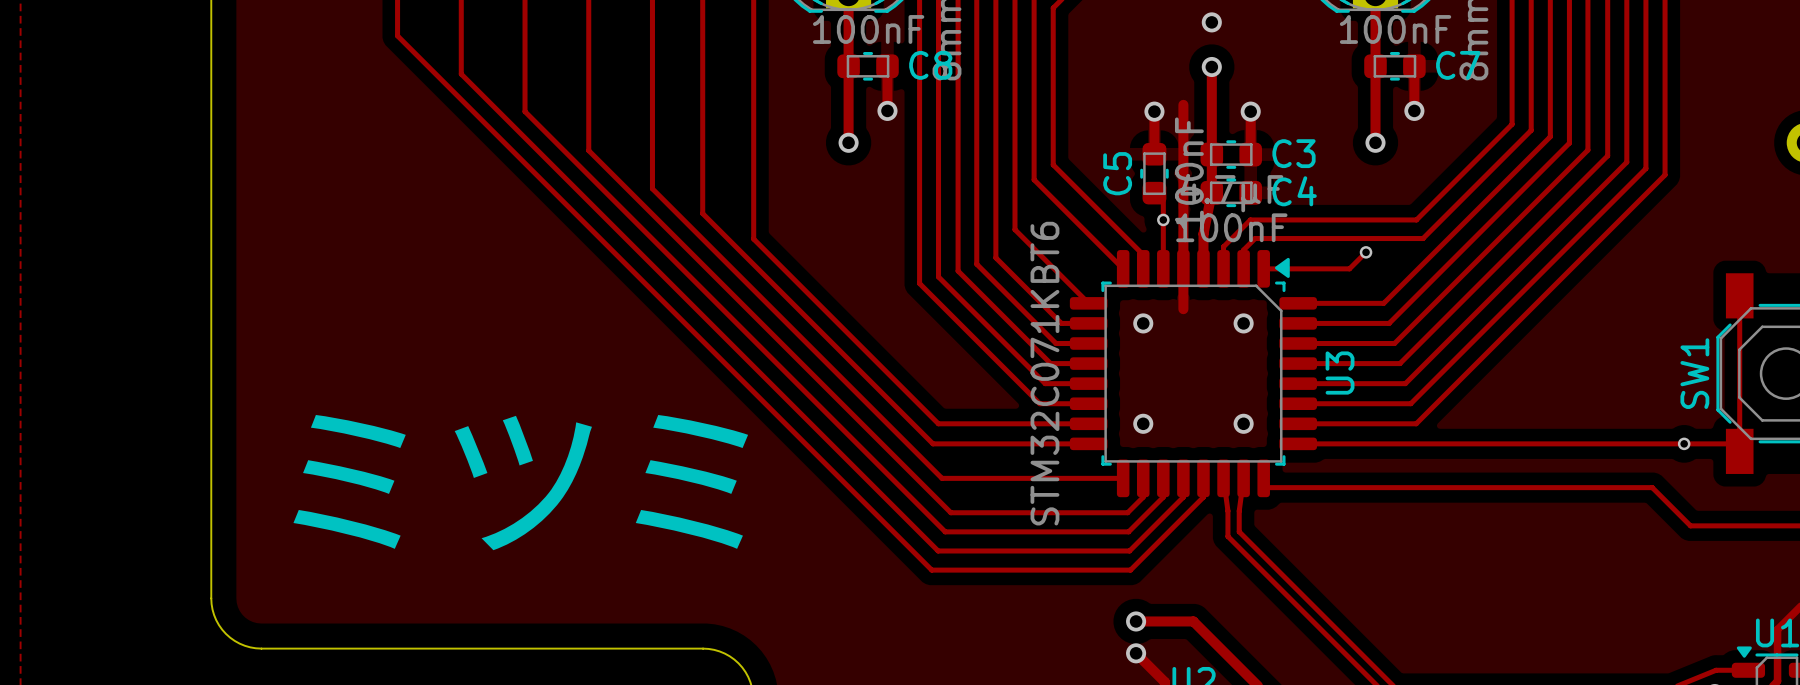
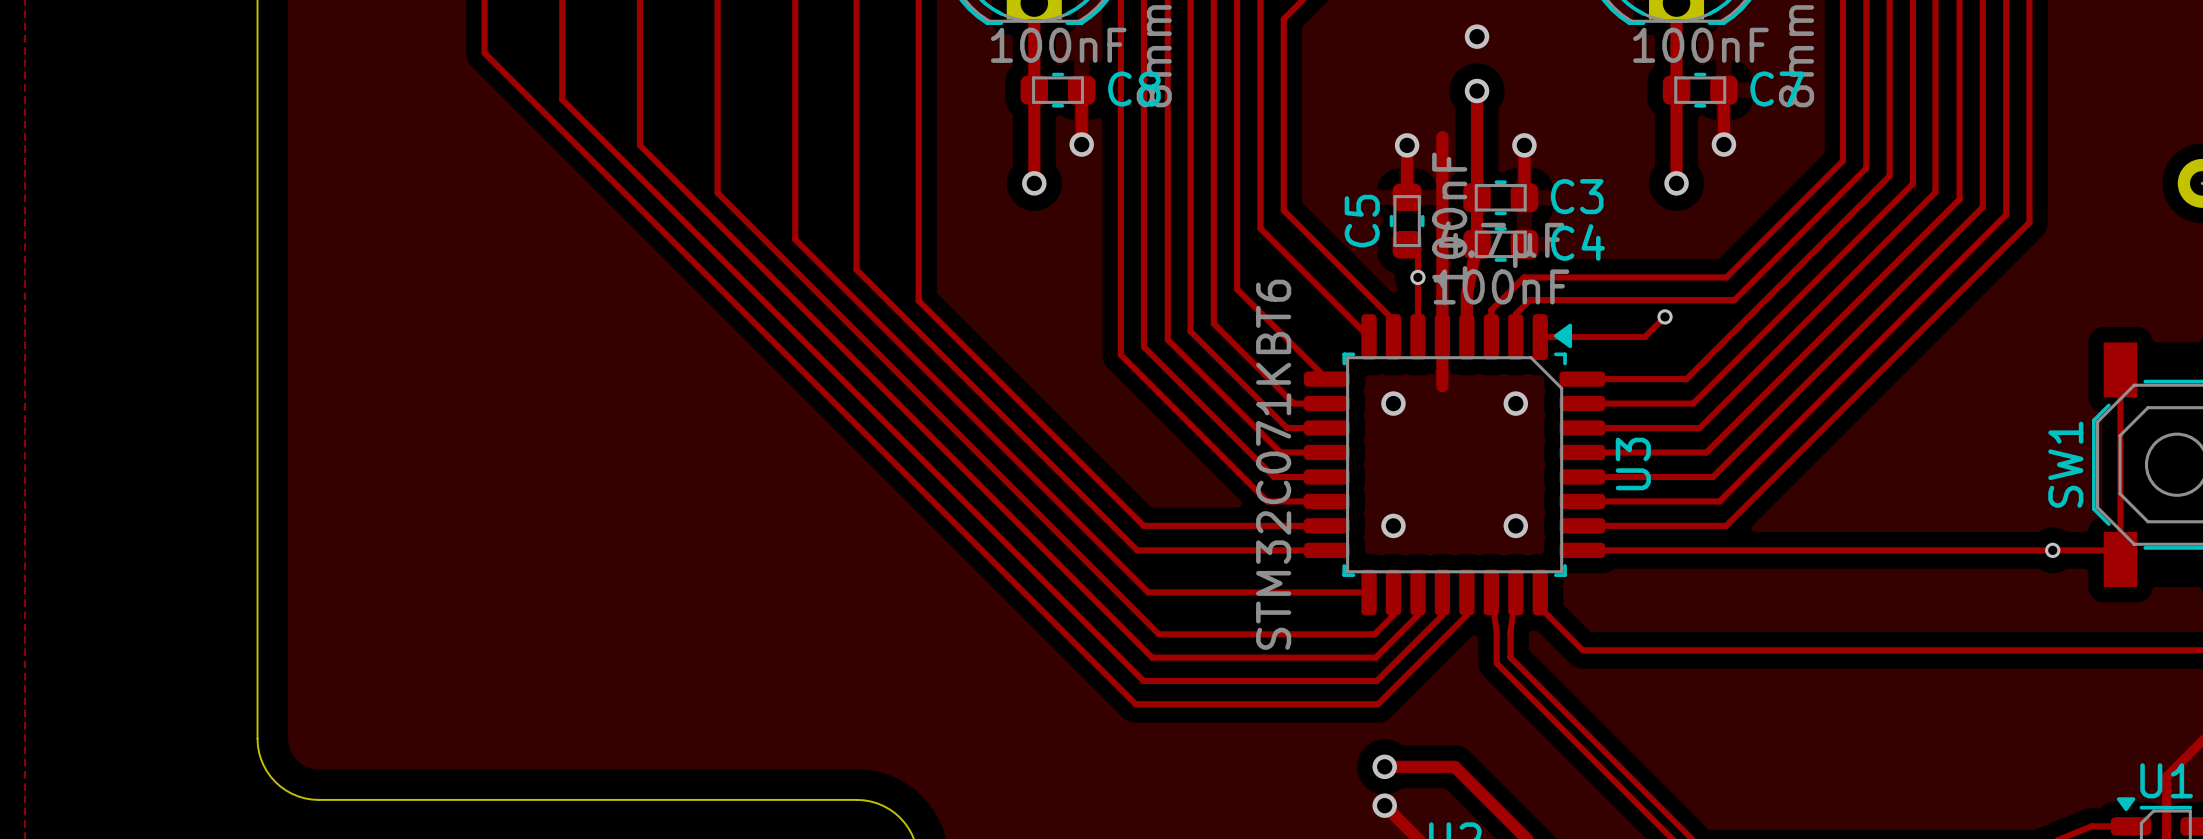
text: ミツミ (520, 482) -> none
track: (1263, 487) (1652, 487) (1690, 525) -> (1540, 592) (1540, 607) (1582, 650) (2060, 650)

